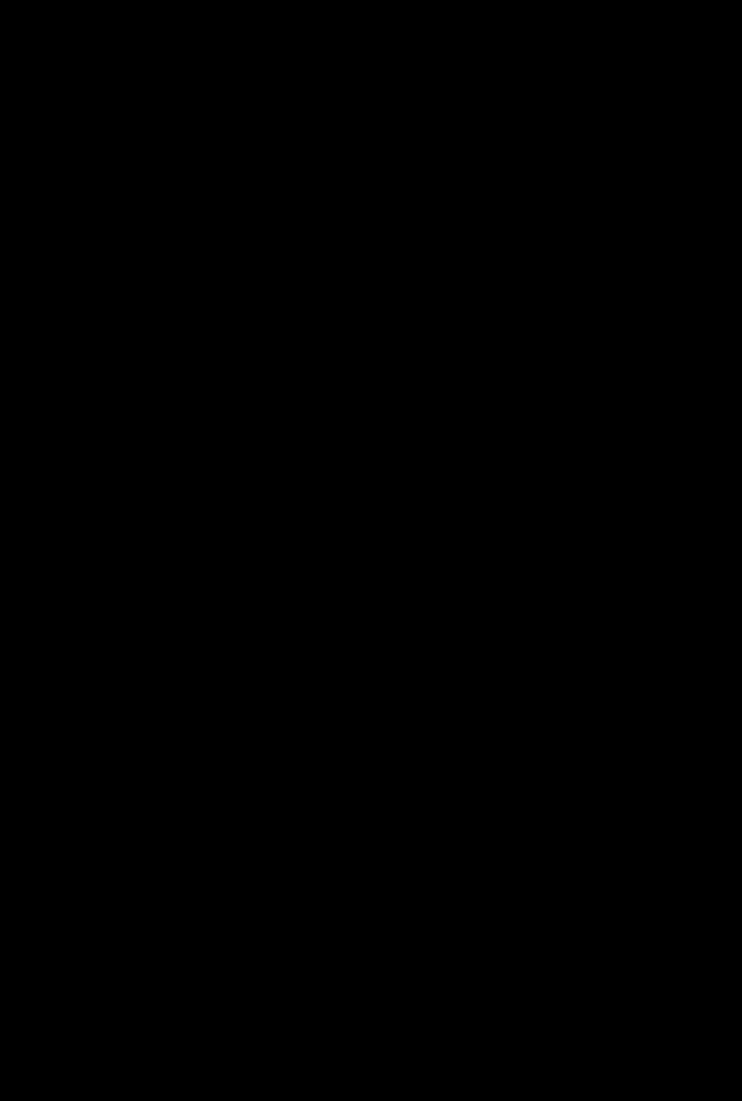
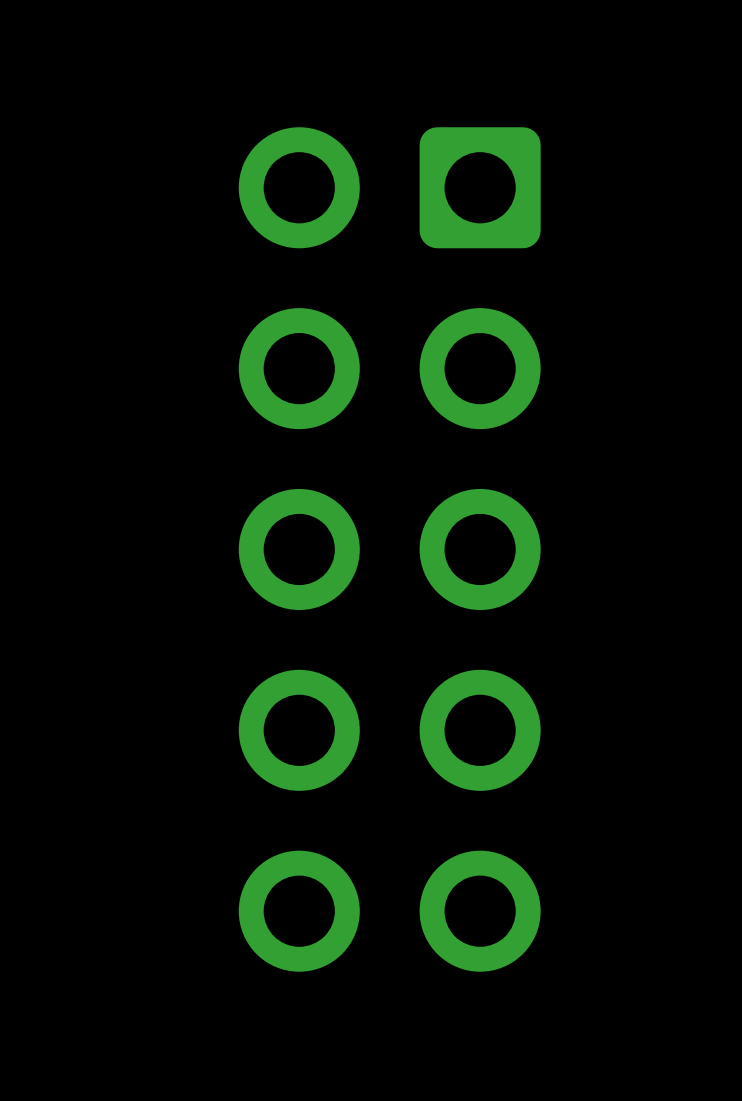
part: none -> (389, 549)

